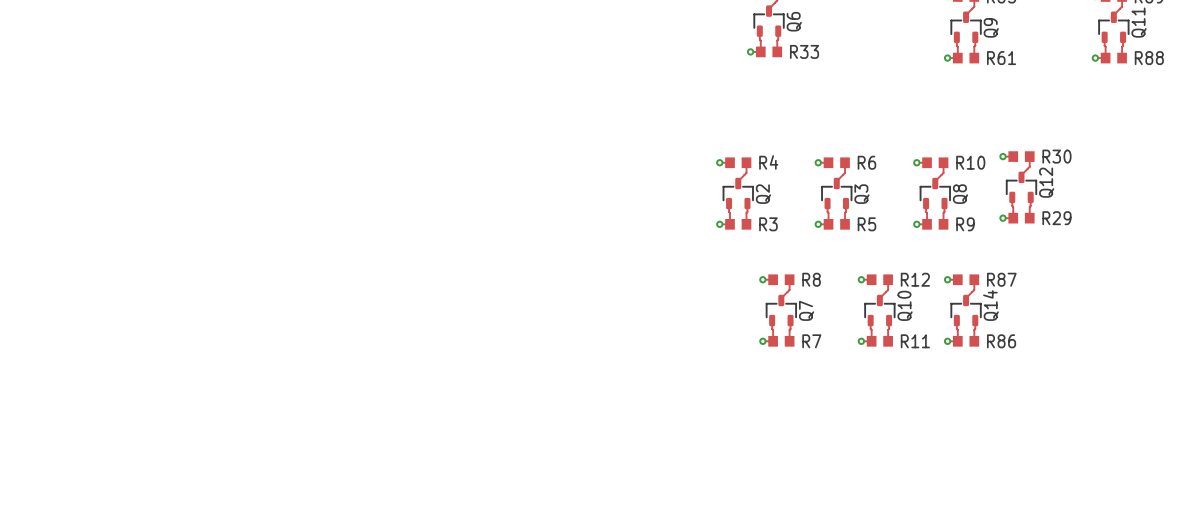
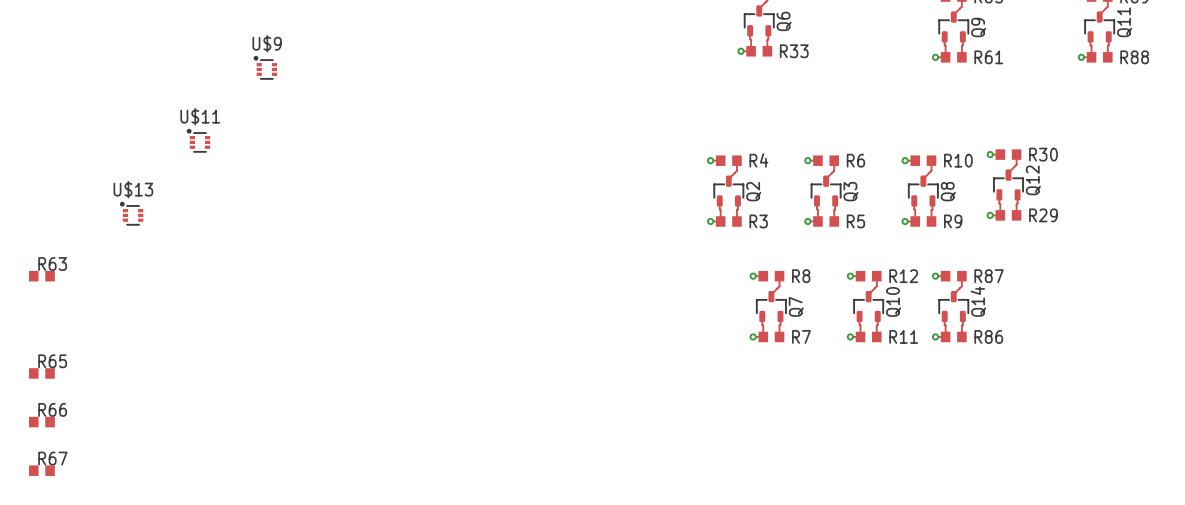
U$9: none -> (265, 67)
U$11: none -> (198, 140)
U$13: none -> (131, 213)
R63: none -> (41, 276)
R65: none -> (41, 373)
R66: none -> (41, 422)
R67: none -> (41, 470)

